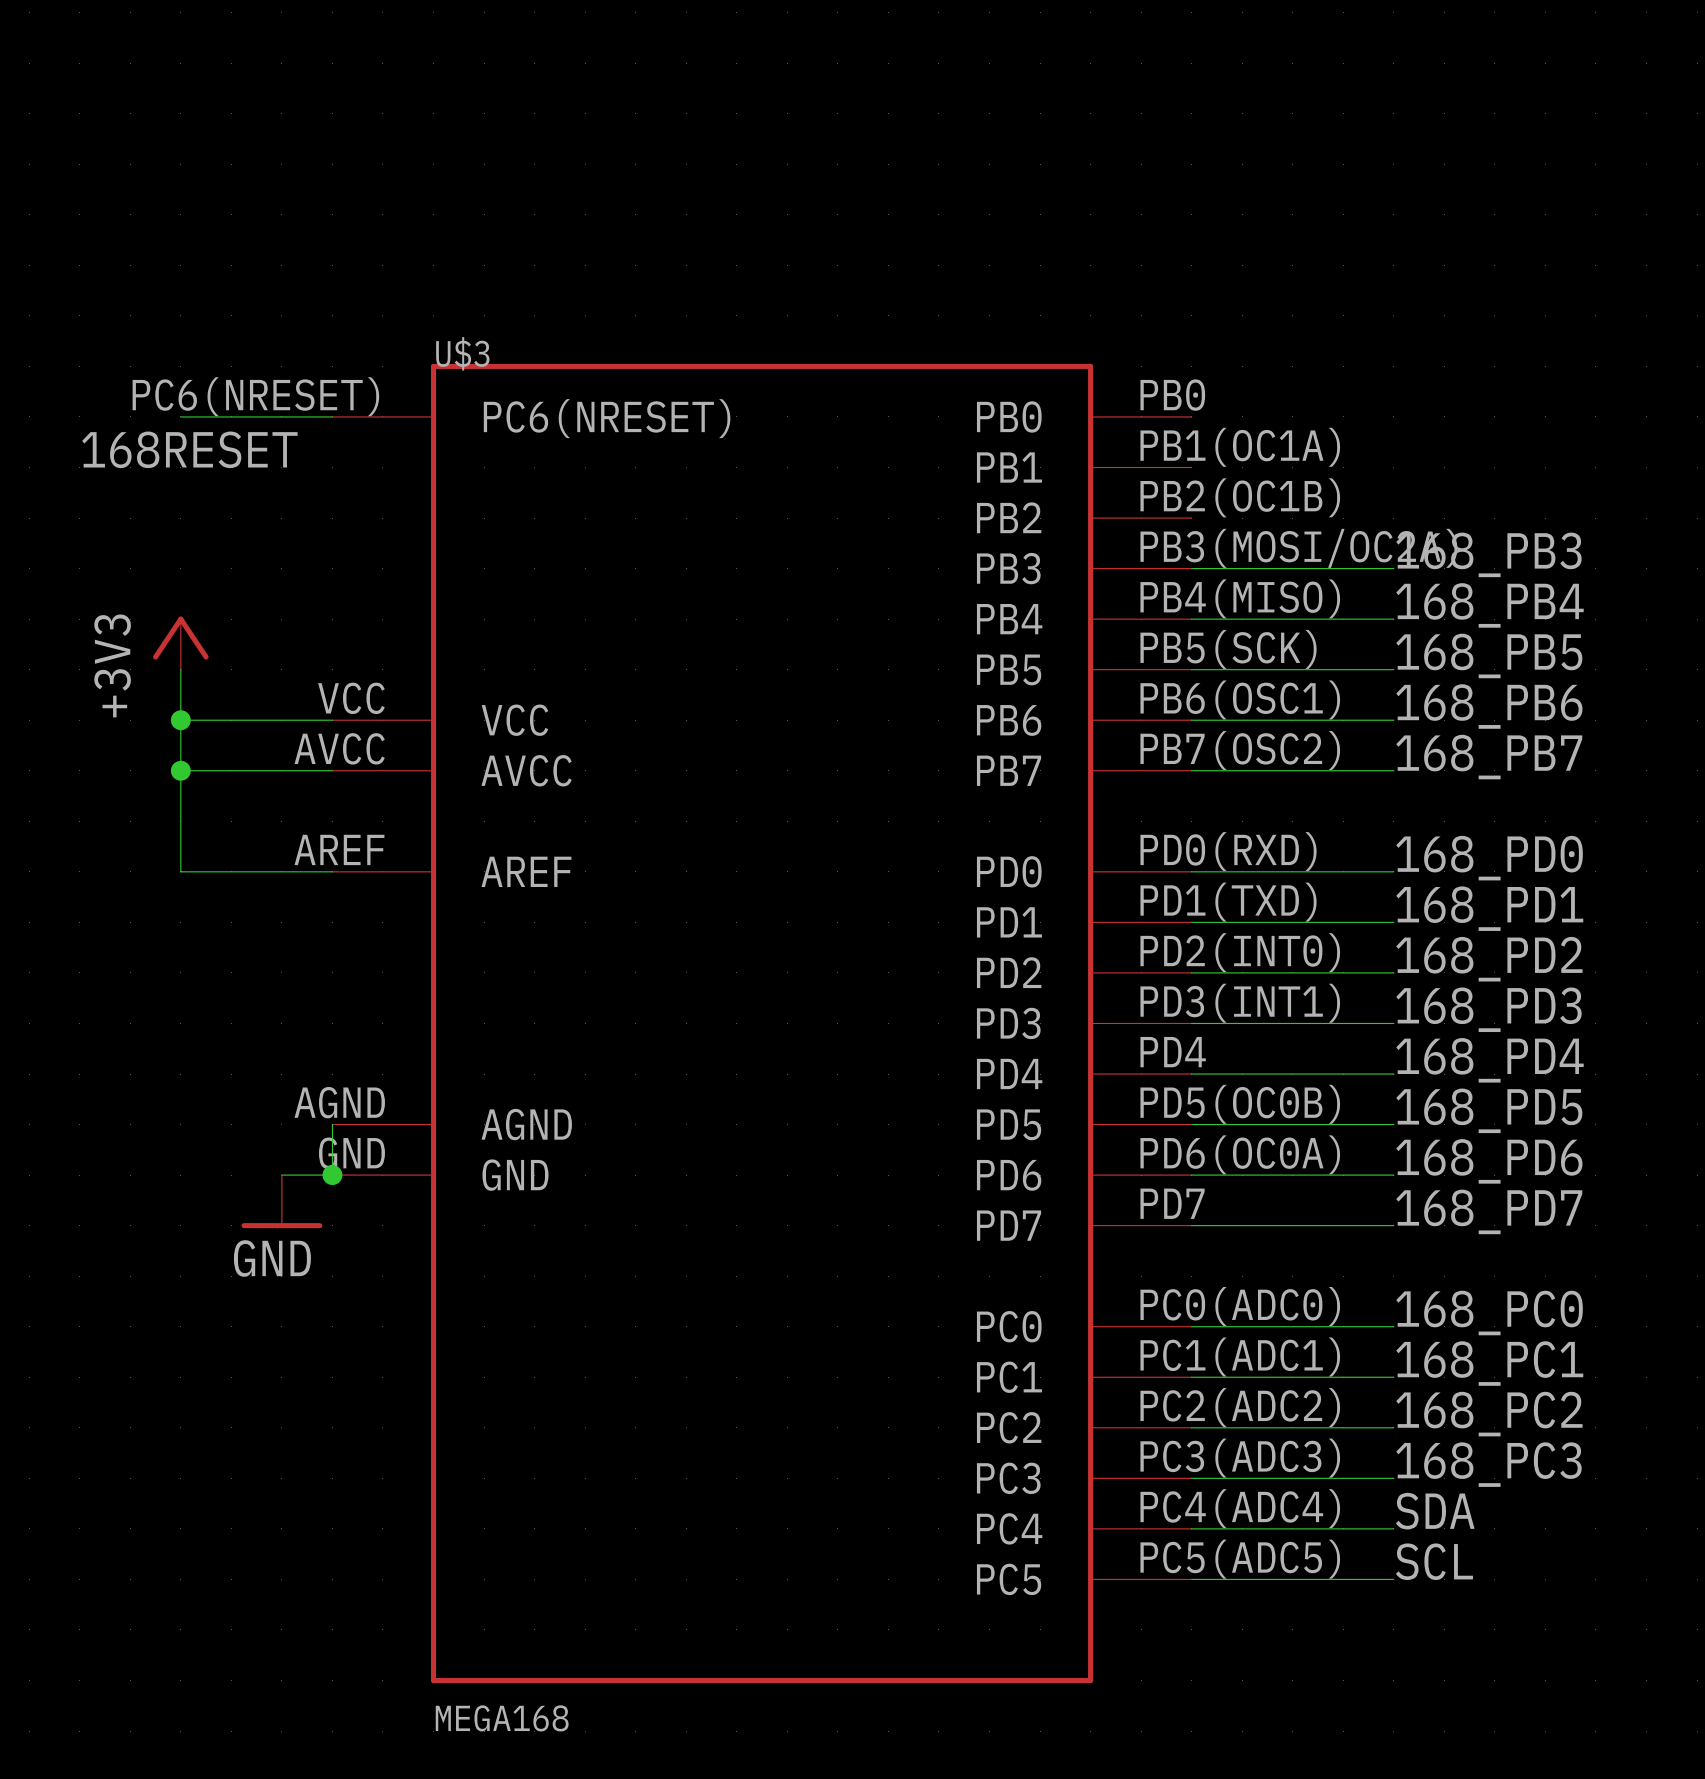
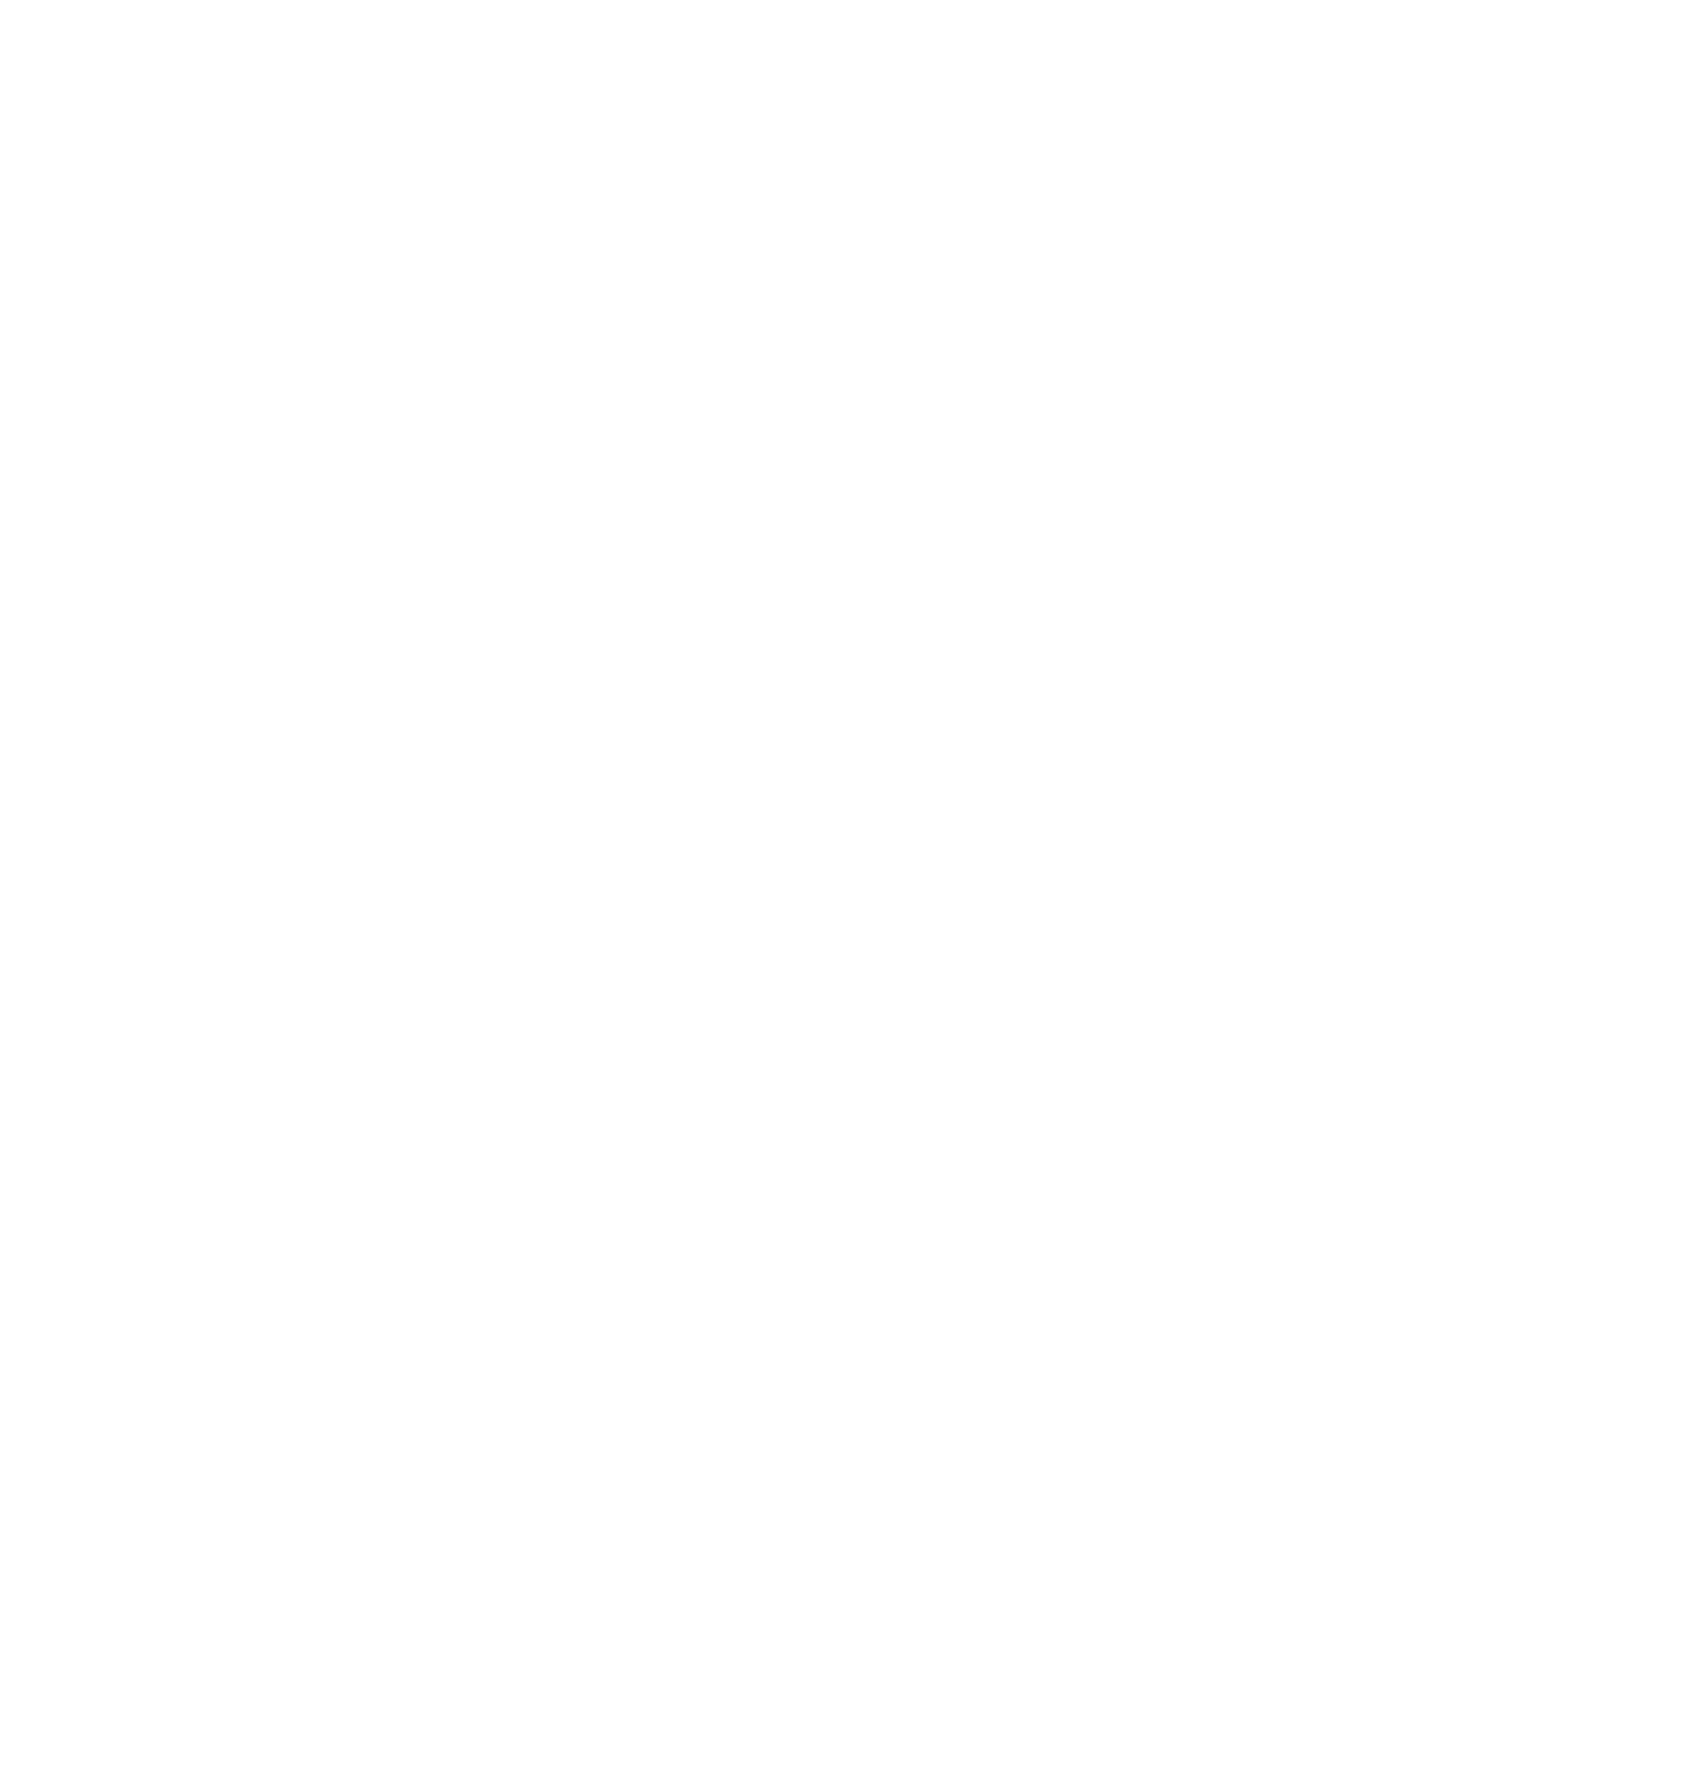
wire: (180, 416) (332, 416) -> none
label: 168RESET (189, 449) -> none
label: 168_PB3 (1488, 554) -> none
wire: (1191, 568) (1393, 568) -> none
label: 168_PB4 (1489, 605) -> none
wire: (1191, 619) (1393, 619) -> none
power symbol: +3V3 (180, 643) -> none
label: 168_PB5 (1489, 655) -> none
wire: (180, 669) (180, 871) (332, 871) -> none
wire: (1191, 669) (1393, 669) -> none
label: 168_PB6 (1489, 706) -> none
wire: (180, 720) (332, 720) -> none
junction: (180, 720) -> none
wire: (1191, 720) (1393, 720) -> none
label: 168_PB7 (1489, 757) -> none
wire: (180, 770) (332, 770) -> none
junction: (180, 770) -> none
wire: (1191, 770) (1393, 770) -> none
label: 168_PD0 (1489, 858) -> none
wire: (1191, 871) (1393, 871) -> none
label: 168_PD1 (1489, 908) -> none
wire: (1191, 922) (1393, 922) -> none
label: 168_PD2 (1489, 959) -> none
wire: (1191, 972) (1393, 972) -> none
label: 168_PD3 (1488, 1009) -> none
U$3: MEGA168 (762, 1023) -> none
wire: (1191, 1023) (1393, 1023) -> none
label: 168_PD4 (1489, 1060) -> none
wire: (1191, 1074) (1393, 1074) -> none
label: 168_PD5 (1489, 1110) -> none
wire: (332, 1124) (332, 1175) (281, 1175) -> none
wire: (1191, 1124) (1393, 1124) -> none
label: 168_PD6 (1489, 1161) -> none
junction: (332, 1175) -> none
wire: (1191, 1175) (1393, 1175) -> none
power symbol: GND (281, 1201) -> none
label: 168_PD7 (1489, 1211) -> none
wire: (1191, 1225) (1393, 1225) -> none
label: 168_PC0 (1489, 1313) -> none
wire: (1191, 1326) (1393, 1326) -> none
label: 168_PC1 (1489, 1363) -> none
wire: (1191, 1377) (1393, 1377) -> none
label: 168_PC2 (1489, 1414) -> none
wire: (1191, 1427) (1393, 1427) -> none
label: 168_PC3 (1488, 1464) -> none
wire: (1191, 1478) (1393, 1478) -> none
label: SDA (1435, 1511) -> none
wire: (1191, 1528) (1393, 1528) -> none
label: SCL (1434, 1561) -> none
wire: (1191, 1579) (1393, 1579) -> none

